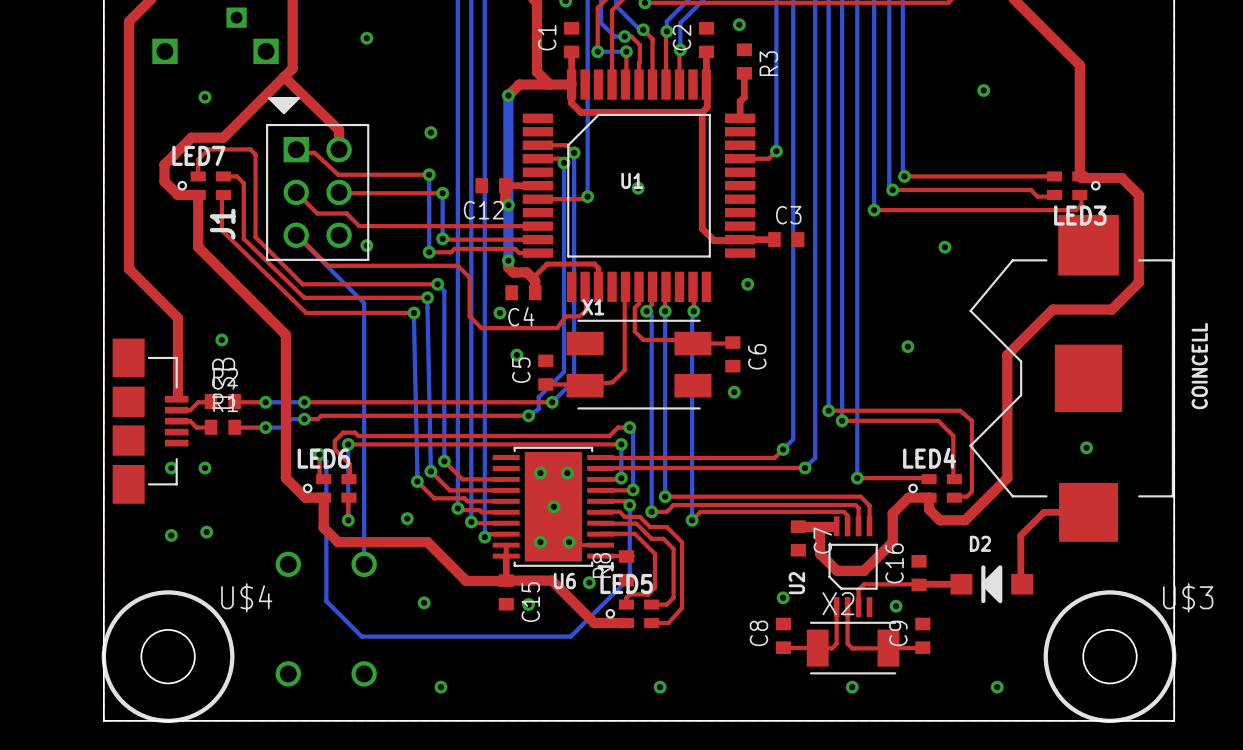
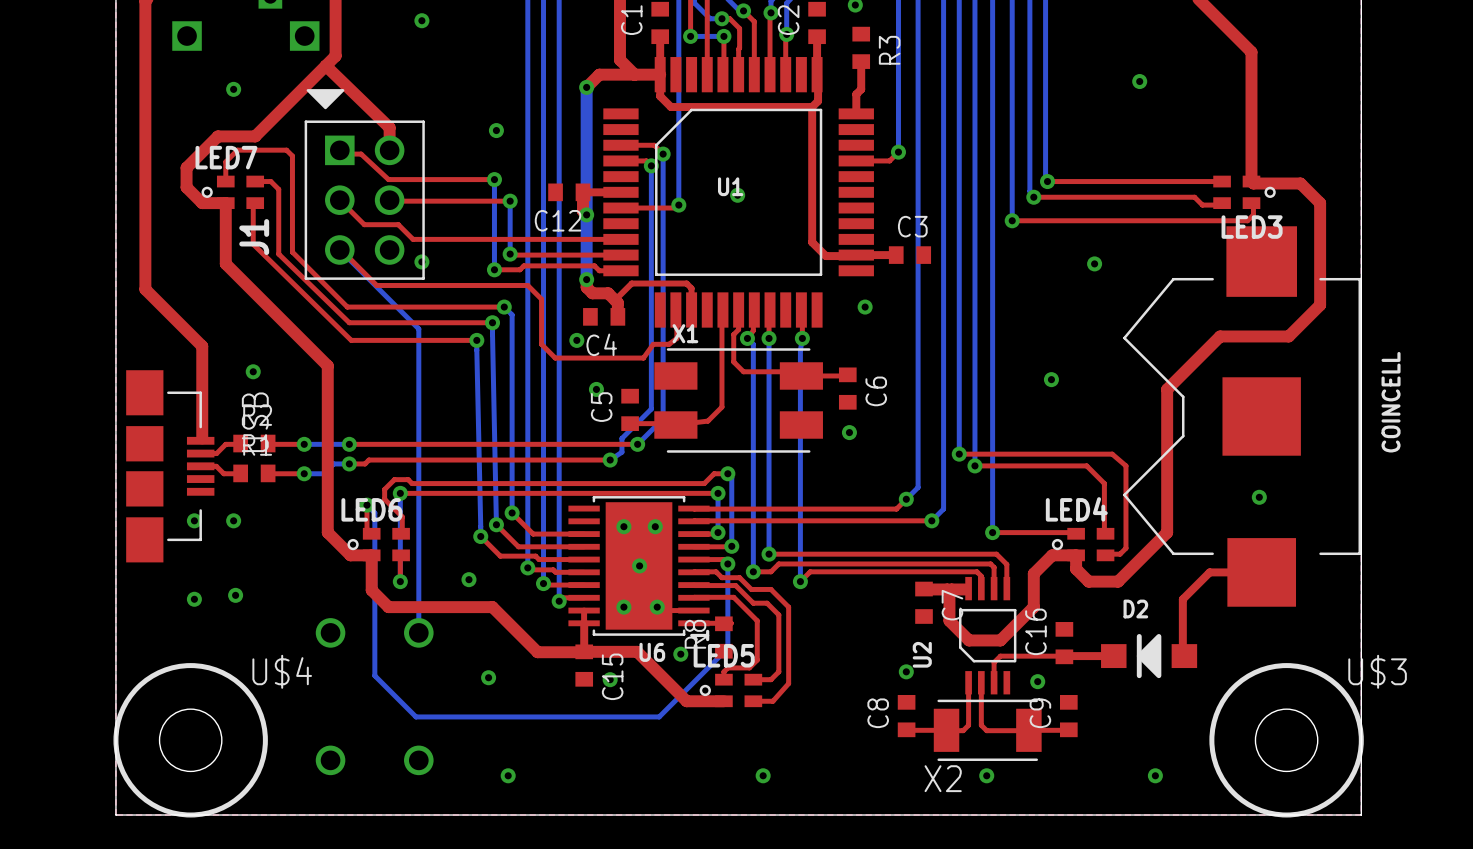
X2 name position: X2 (838, 603) -> X2 (943, 778)

